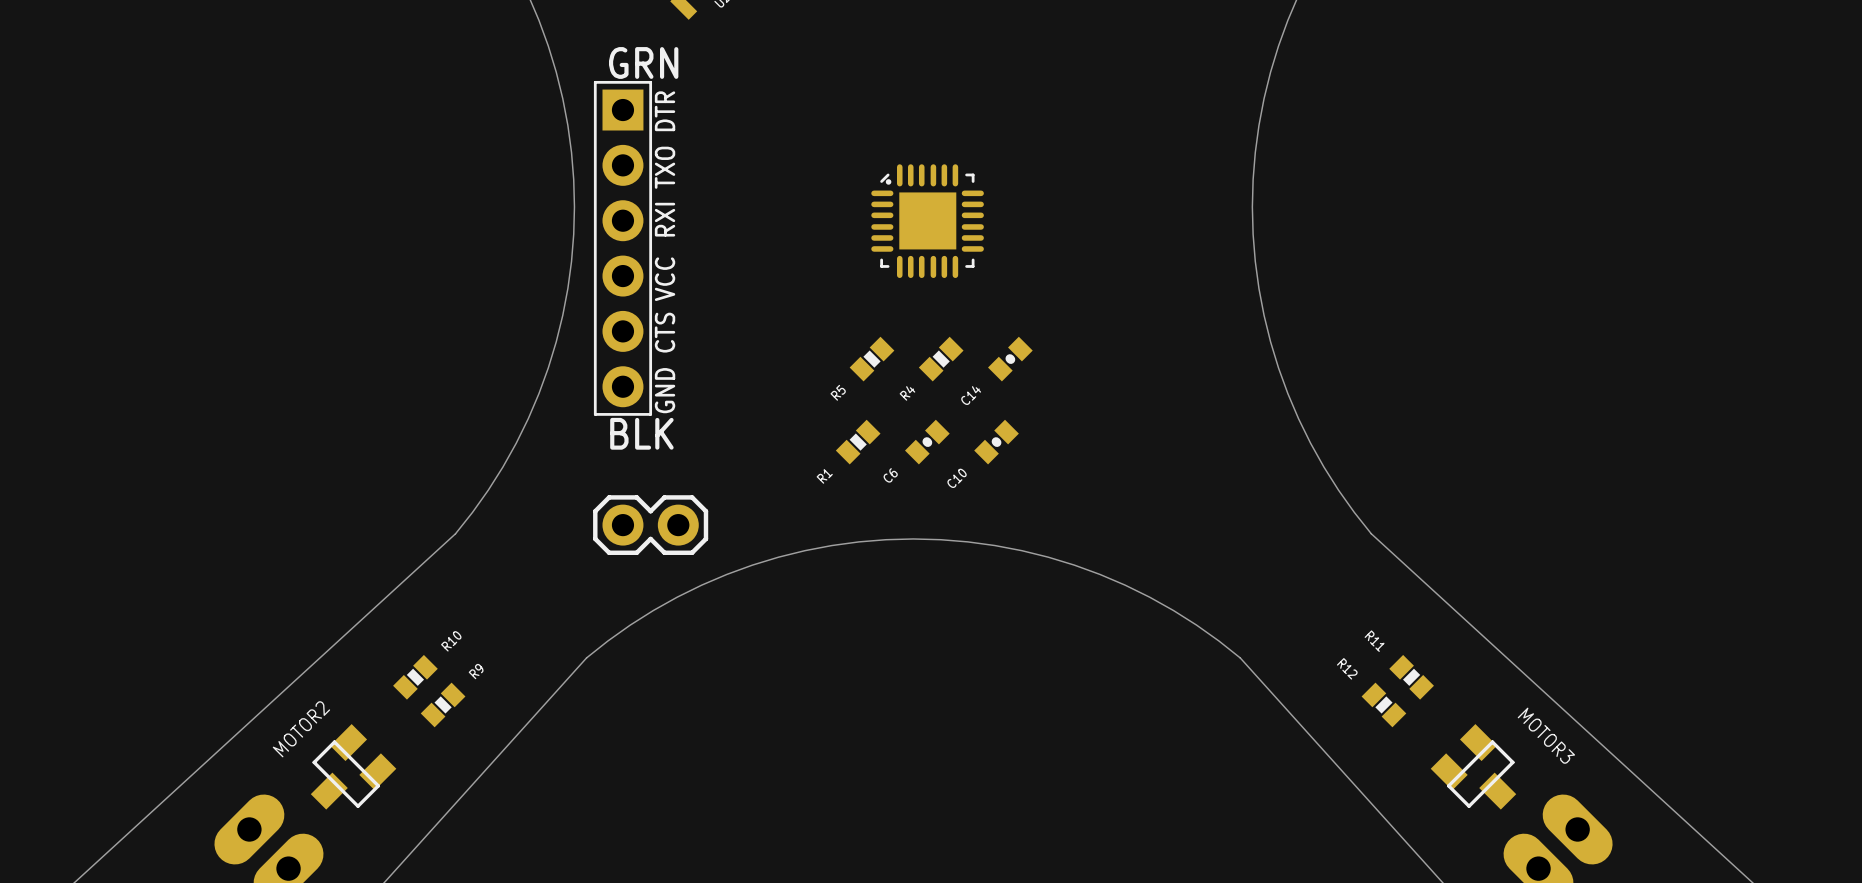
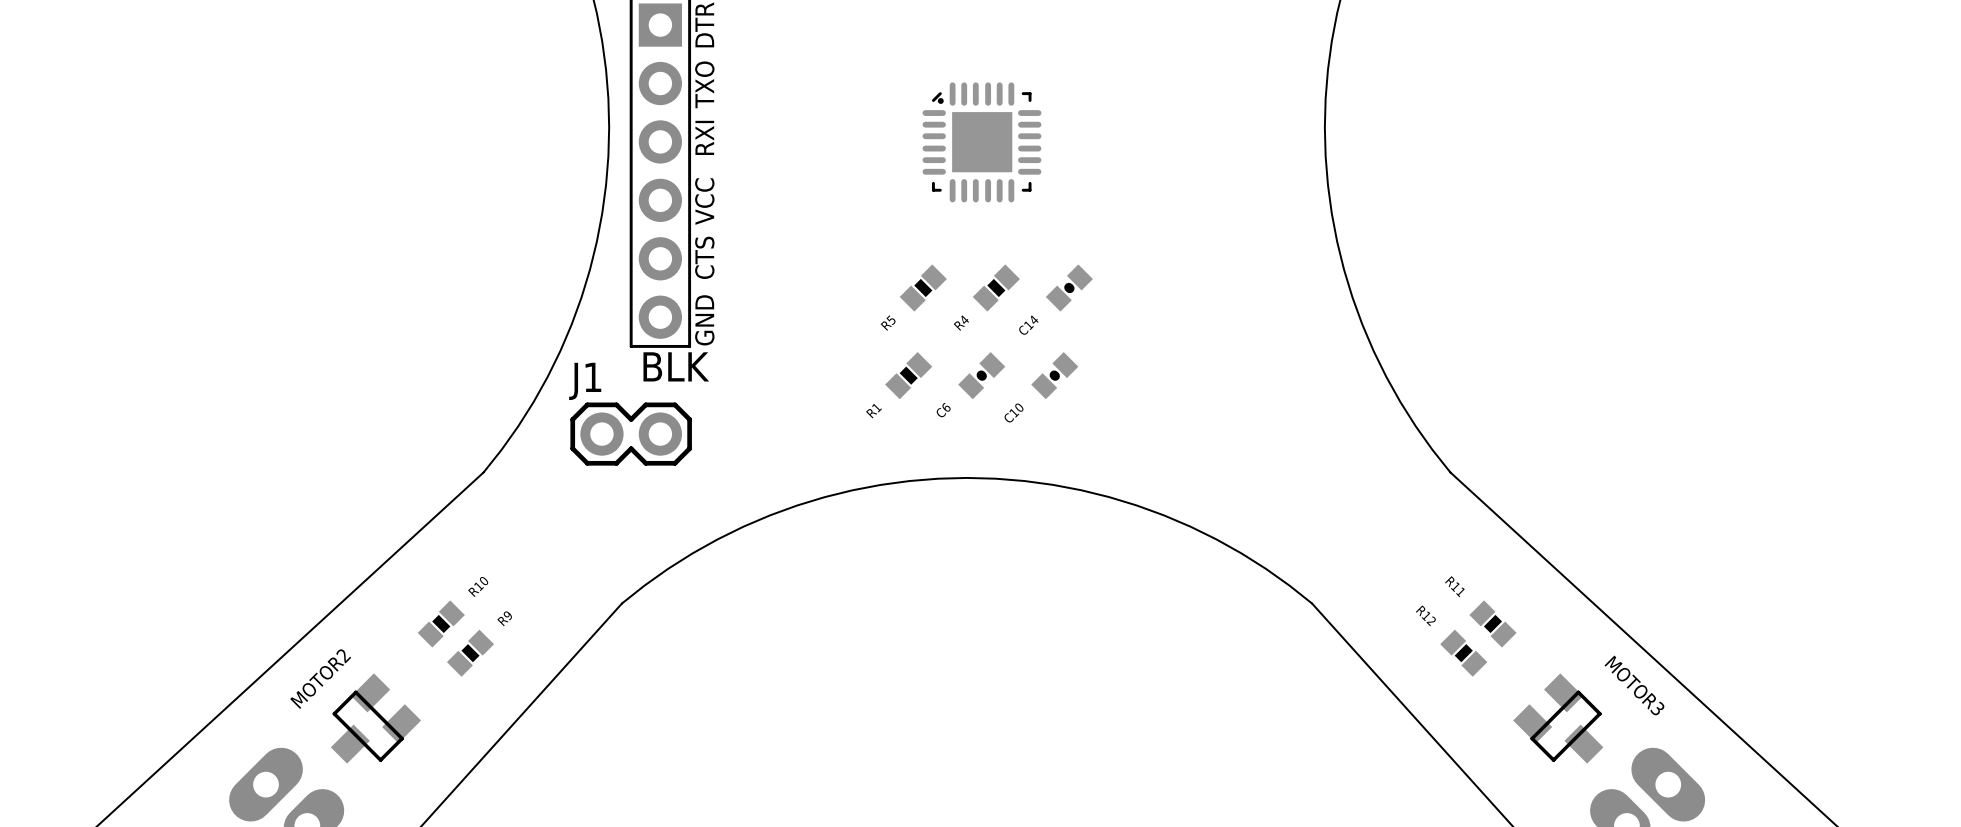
J1: none -> (631, 434)
part: (650, 525) -> none

